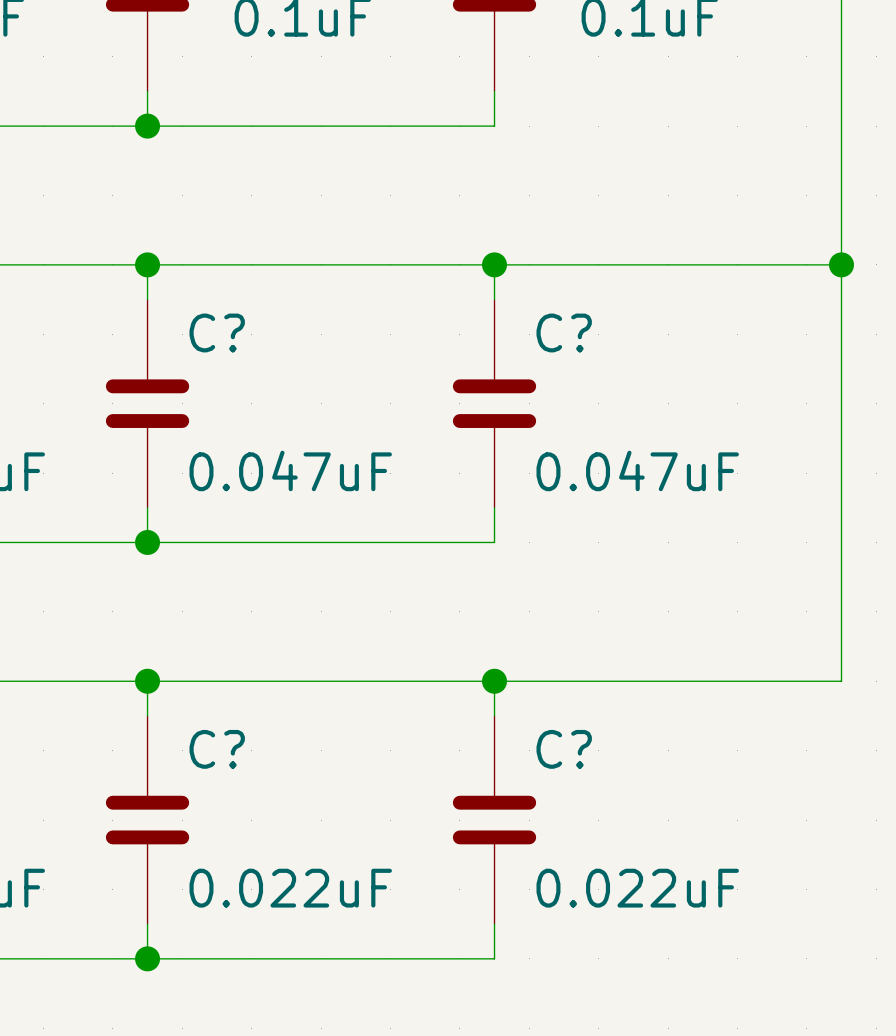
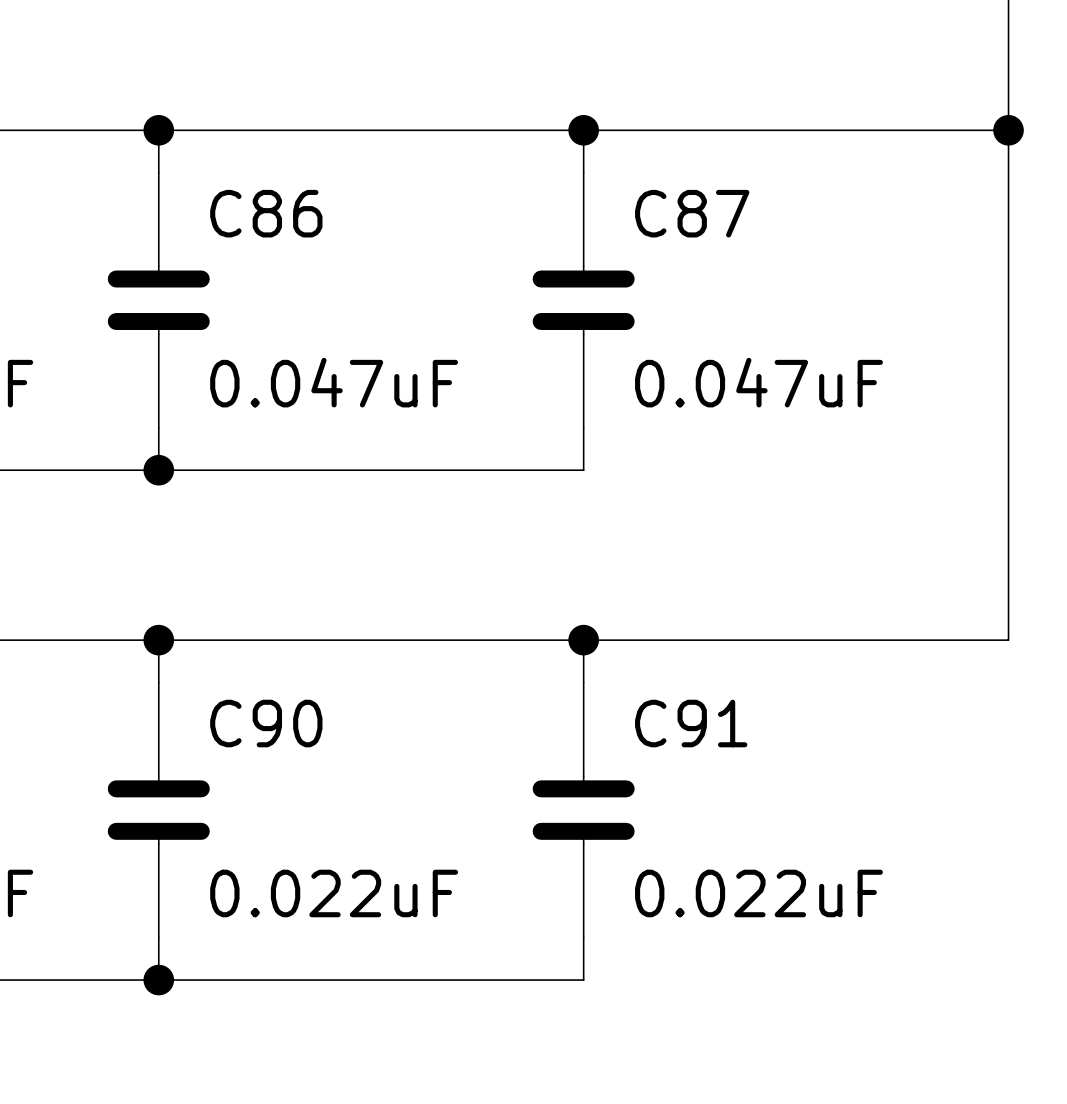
C? name: C? (217, 332) -> C86 (266, 213)
C? name: C? (564, 332) -> C87 (692, 213)
C? name: C? (217, 749) -> C90 (266, 723)
C? name: C? (564, 749) -> C91 (691, 723)

